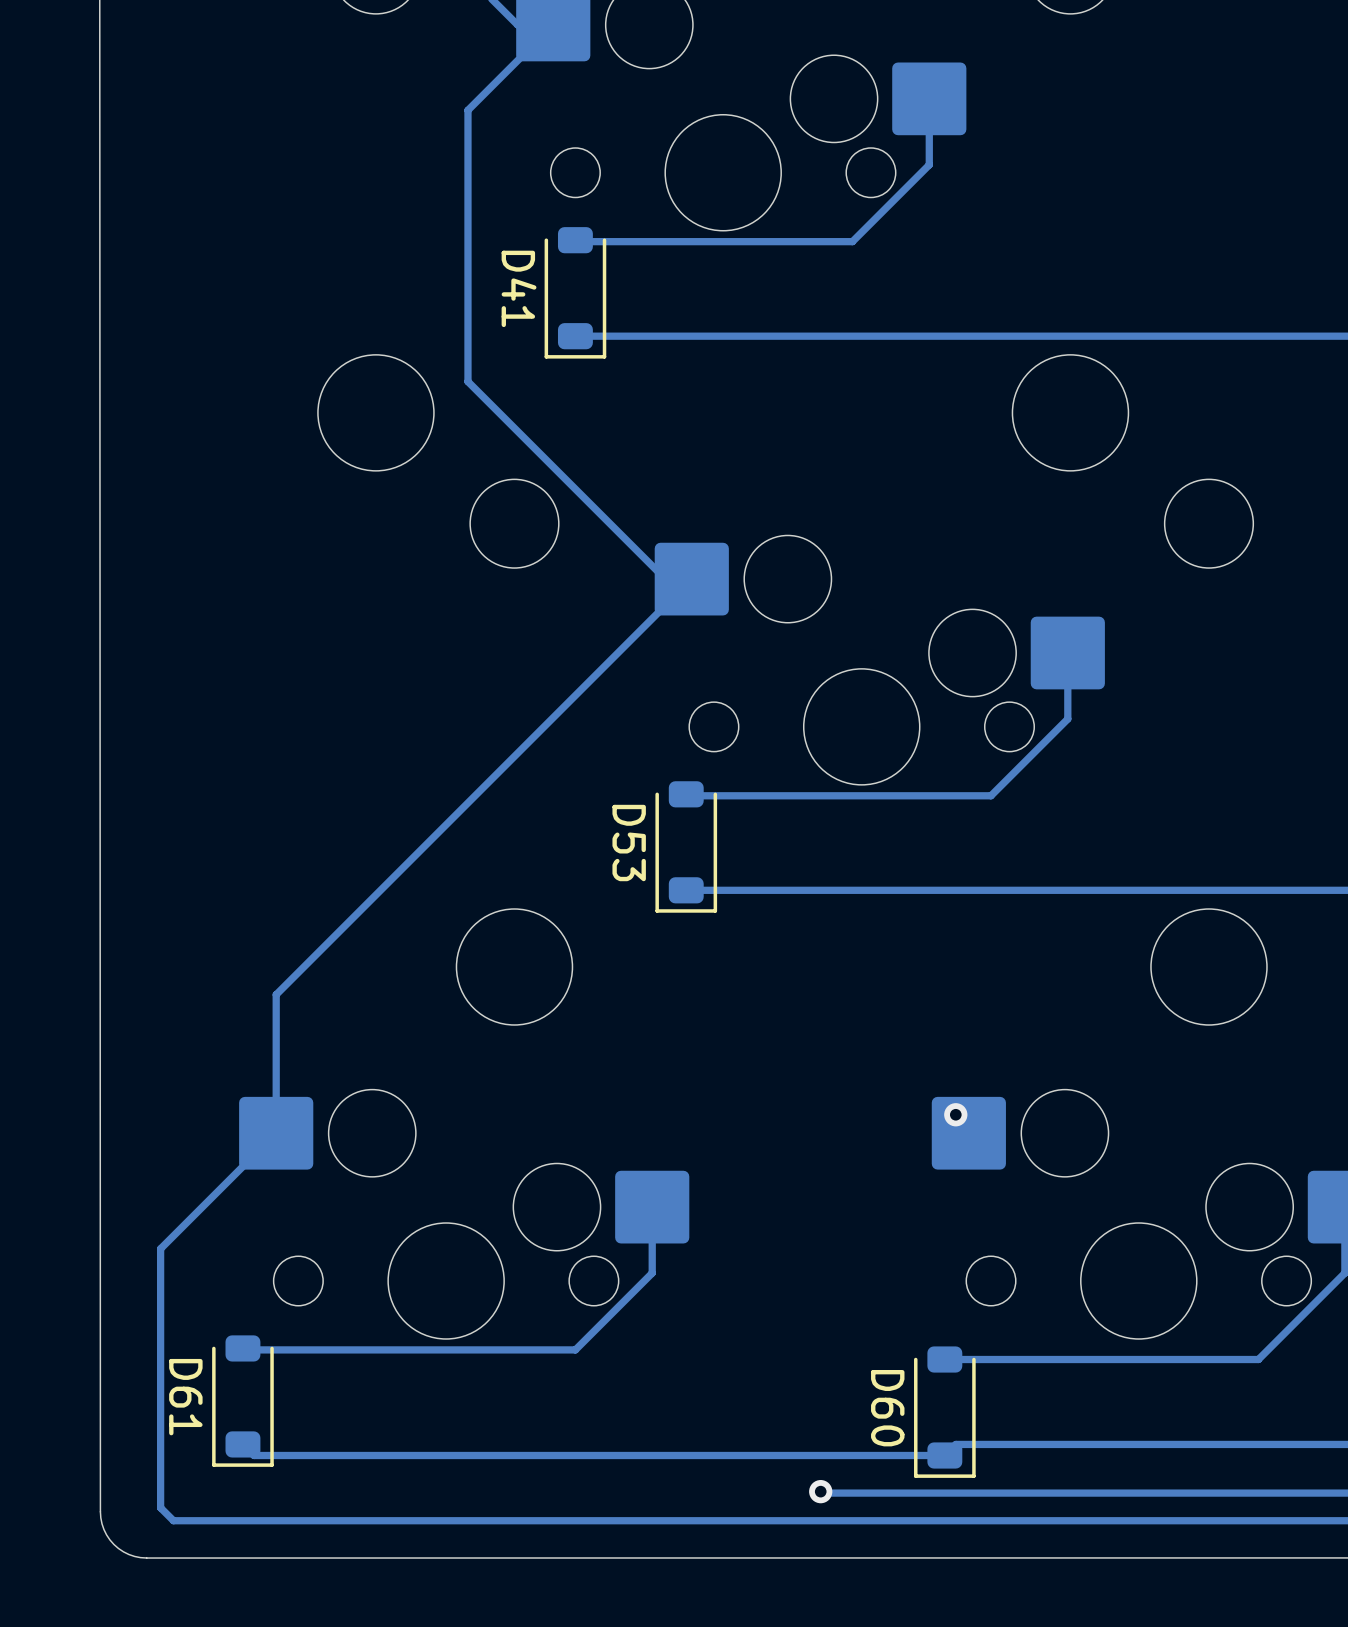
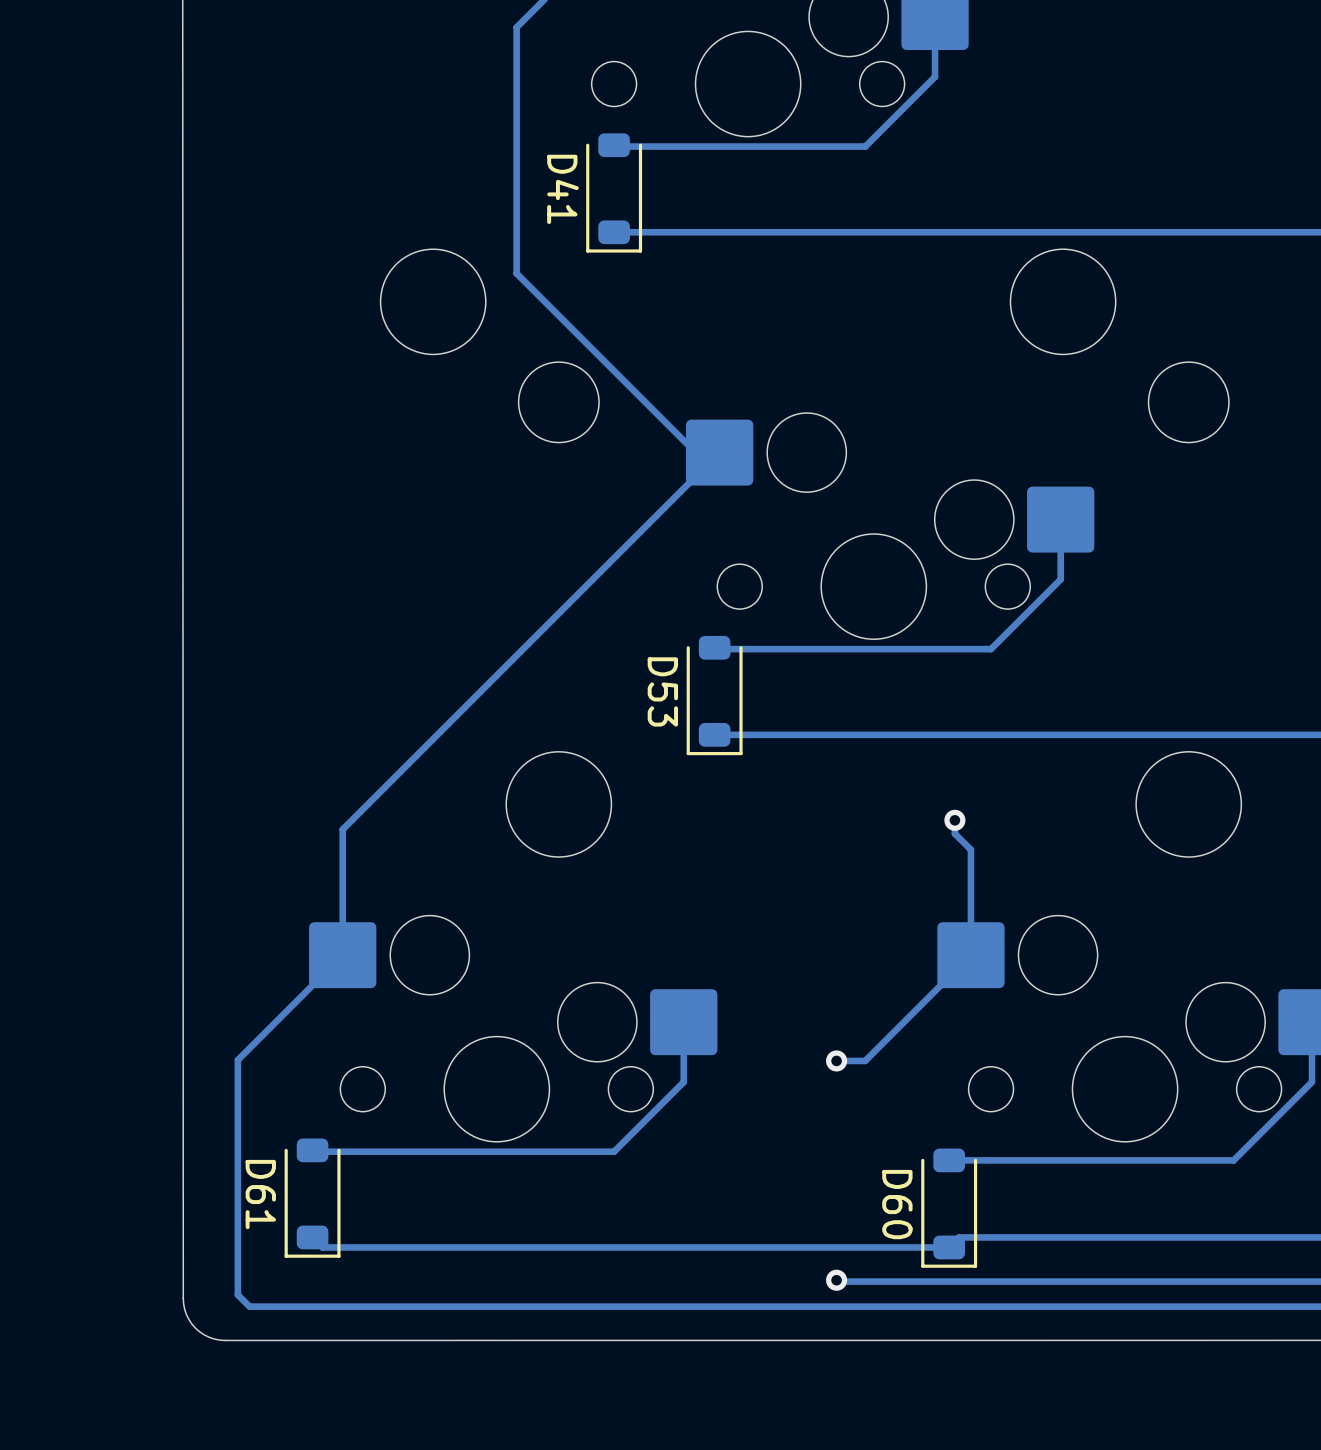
track: none -> (954, 820) (954, 833) (970, 849) (970, 955) (865, 1060) (836, 1060)
via: none -> (954, 820)
via: (955, 1114) -> none
via: none -> (836, 1060)

